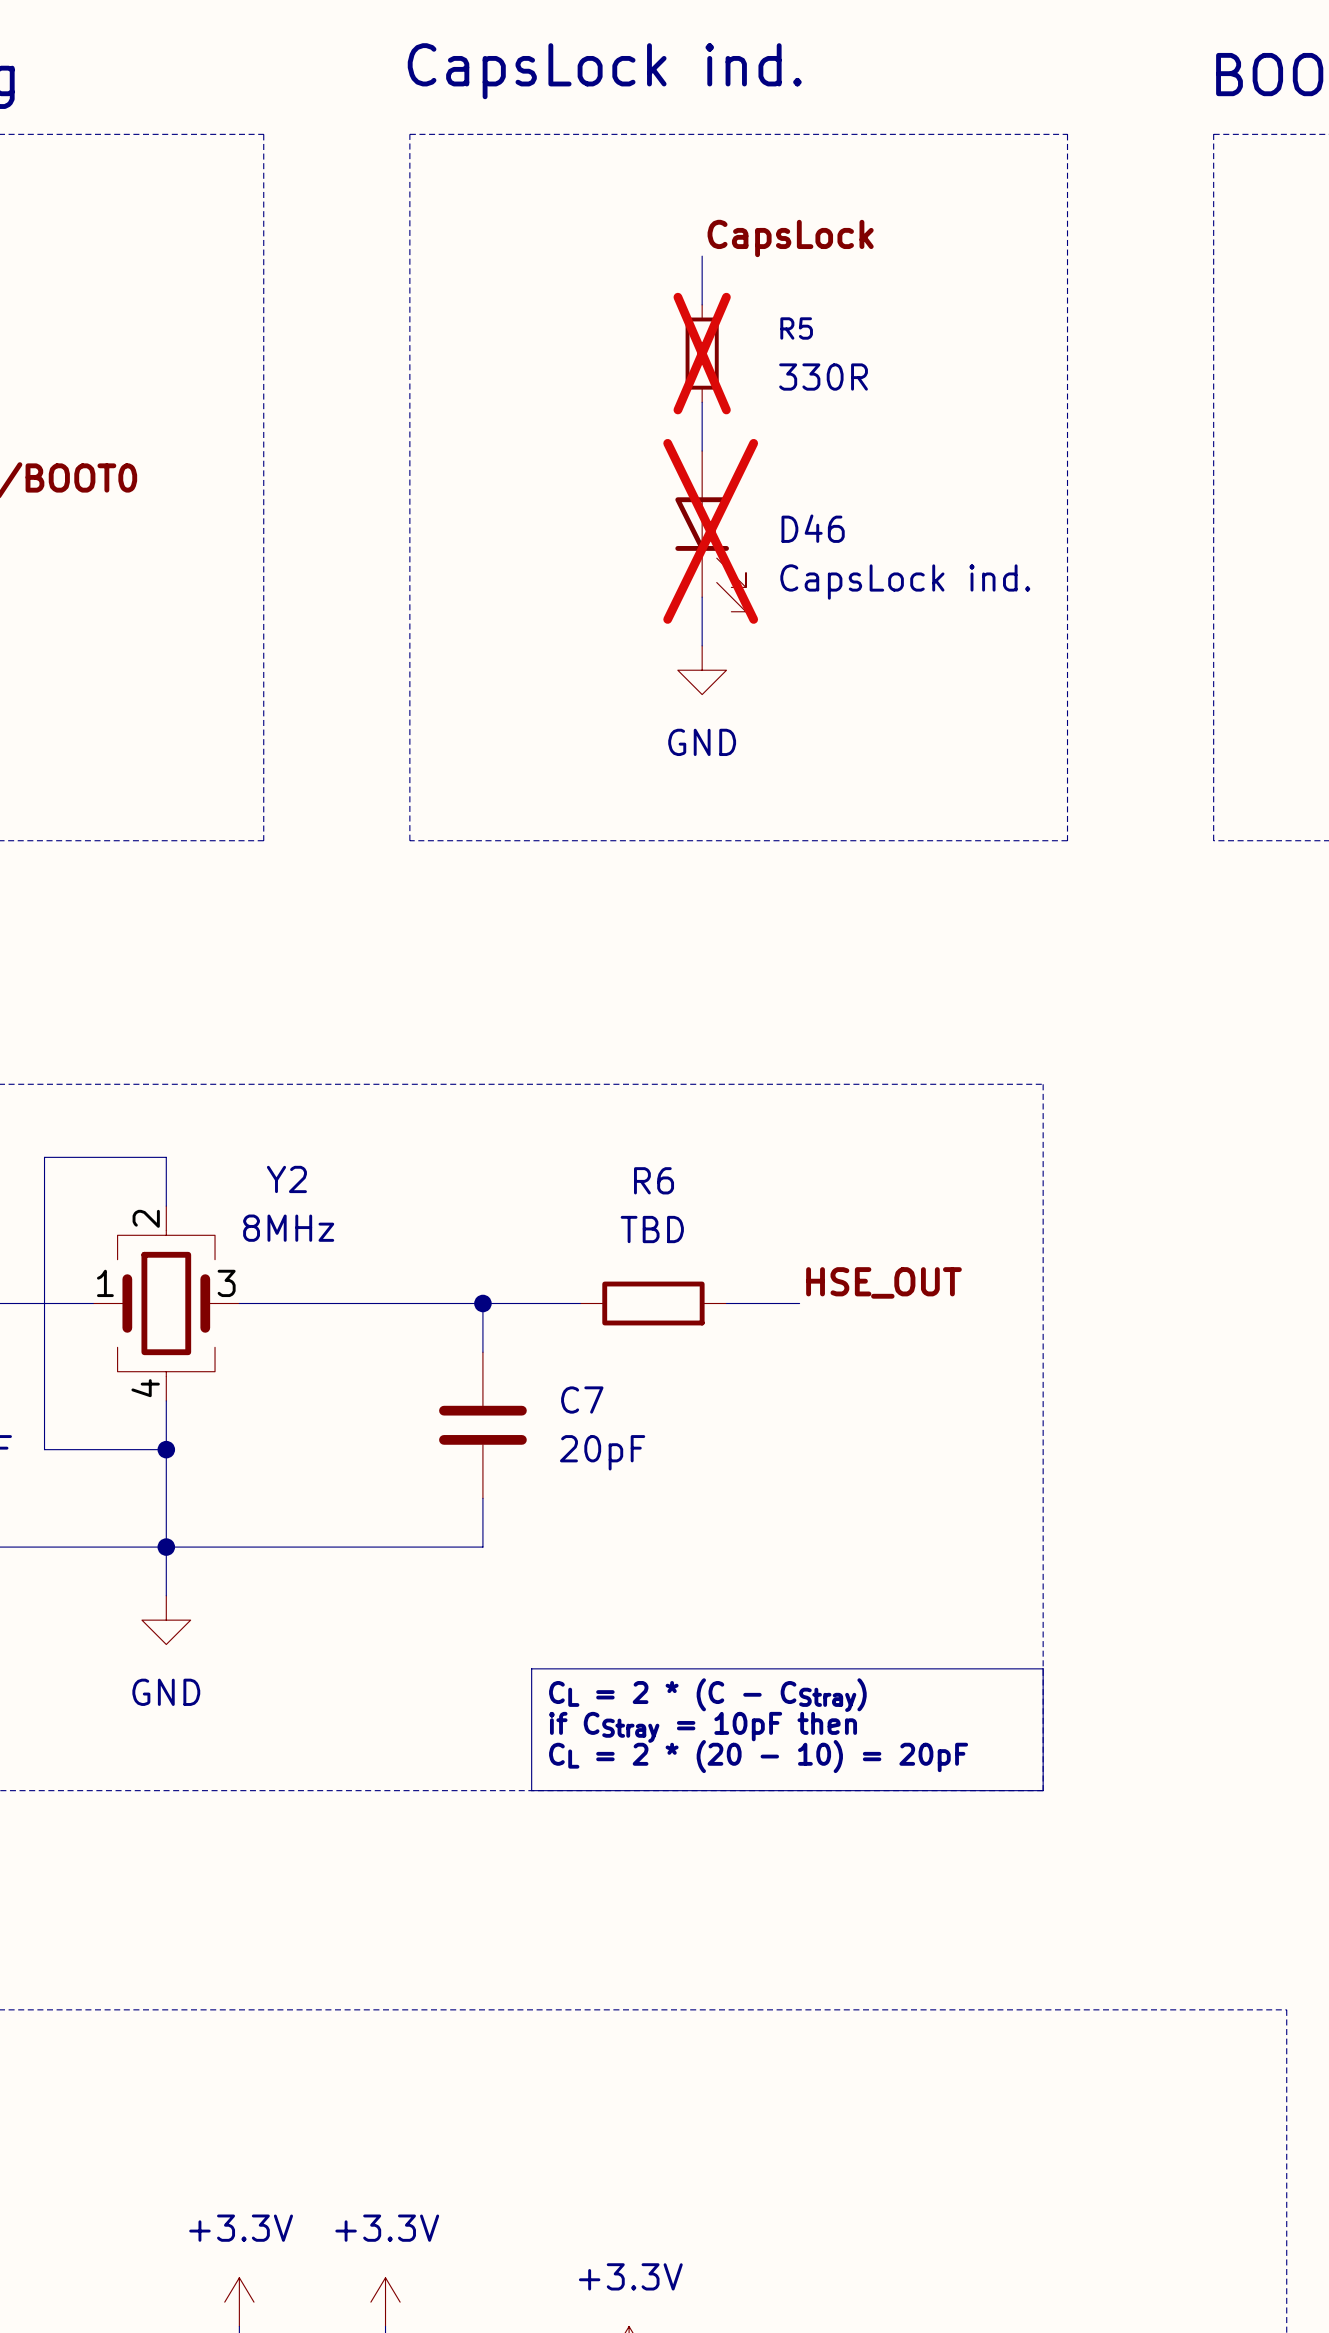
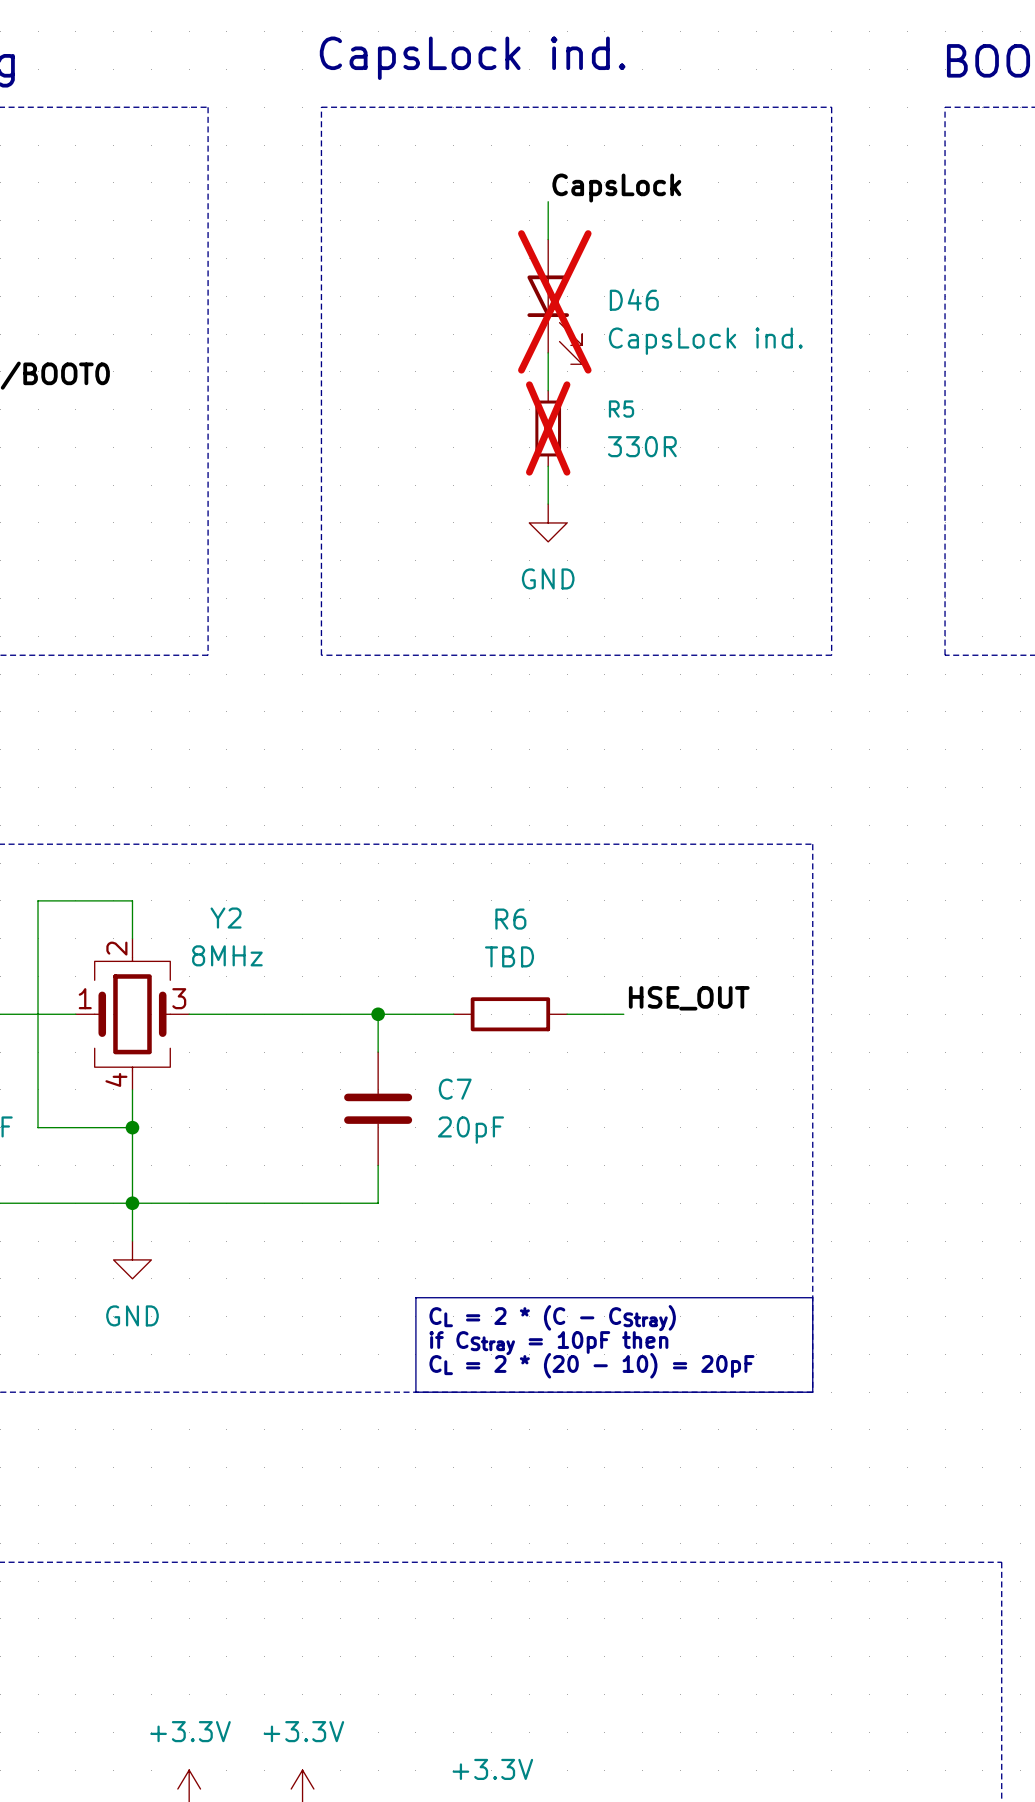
R5 position: (702, 353) -> (548, 428)
D46 position: (710, 531) -> (554, 301)

